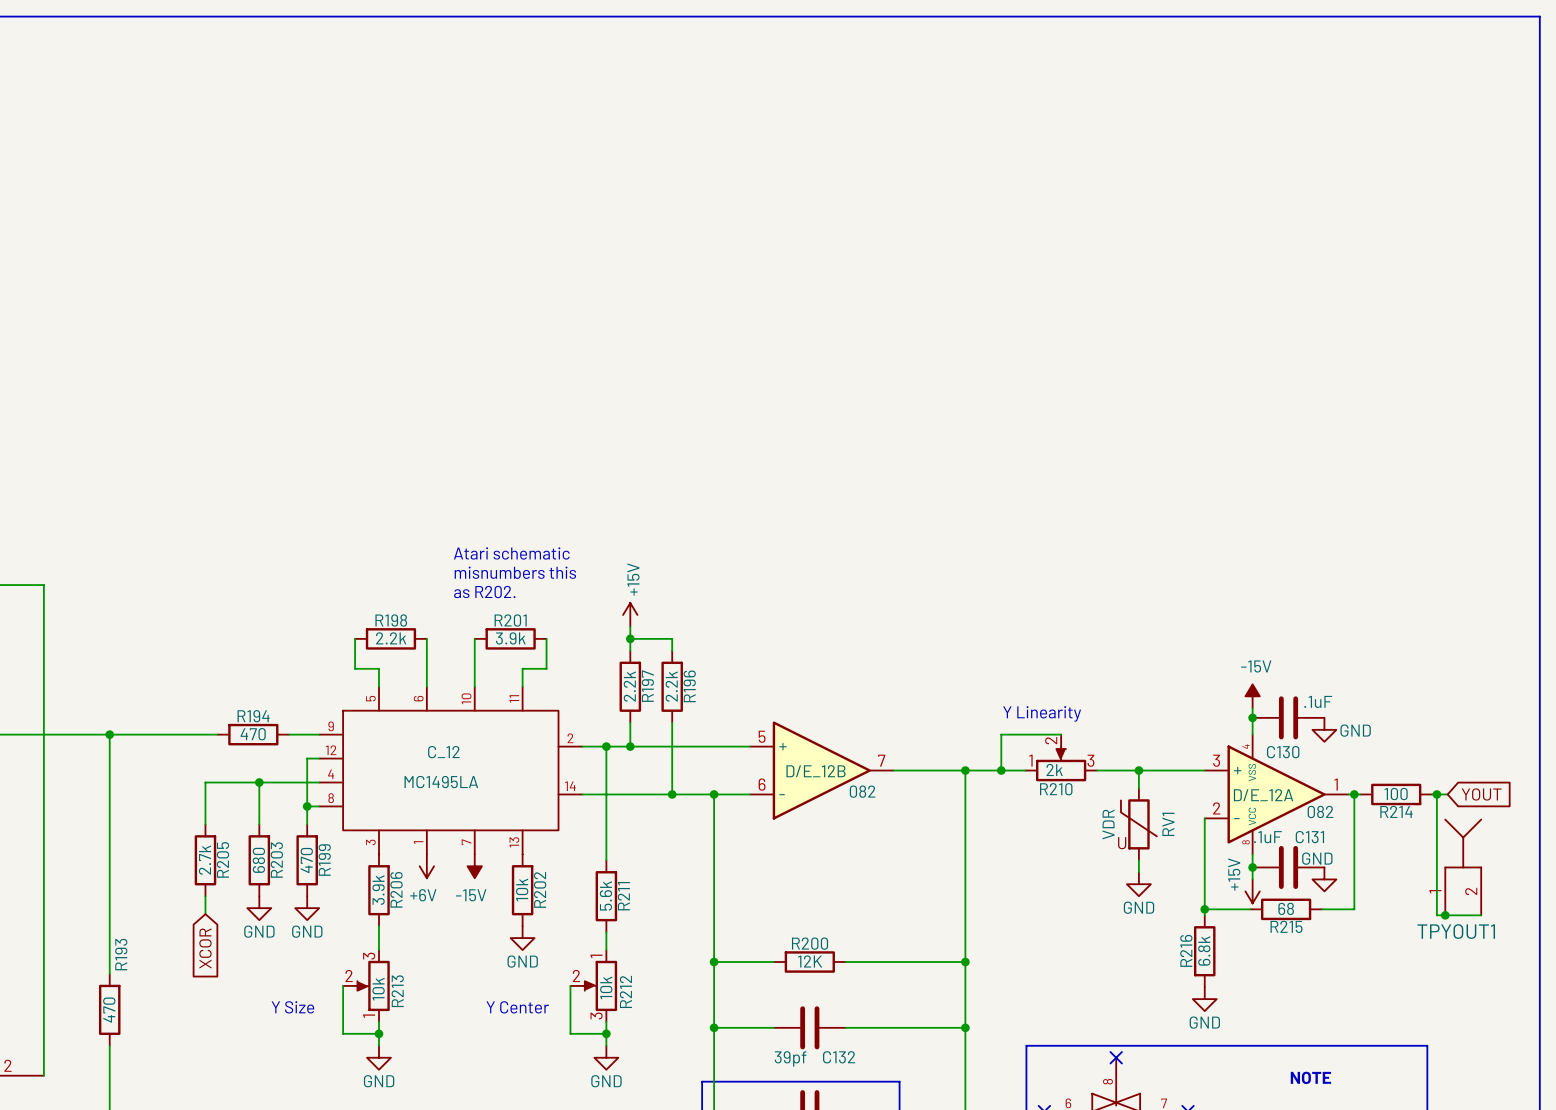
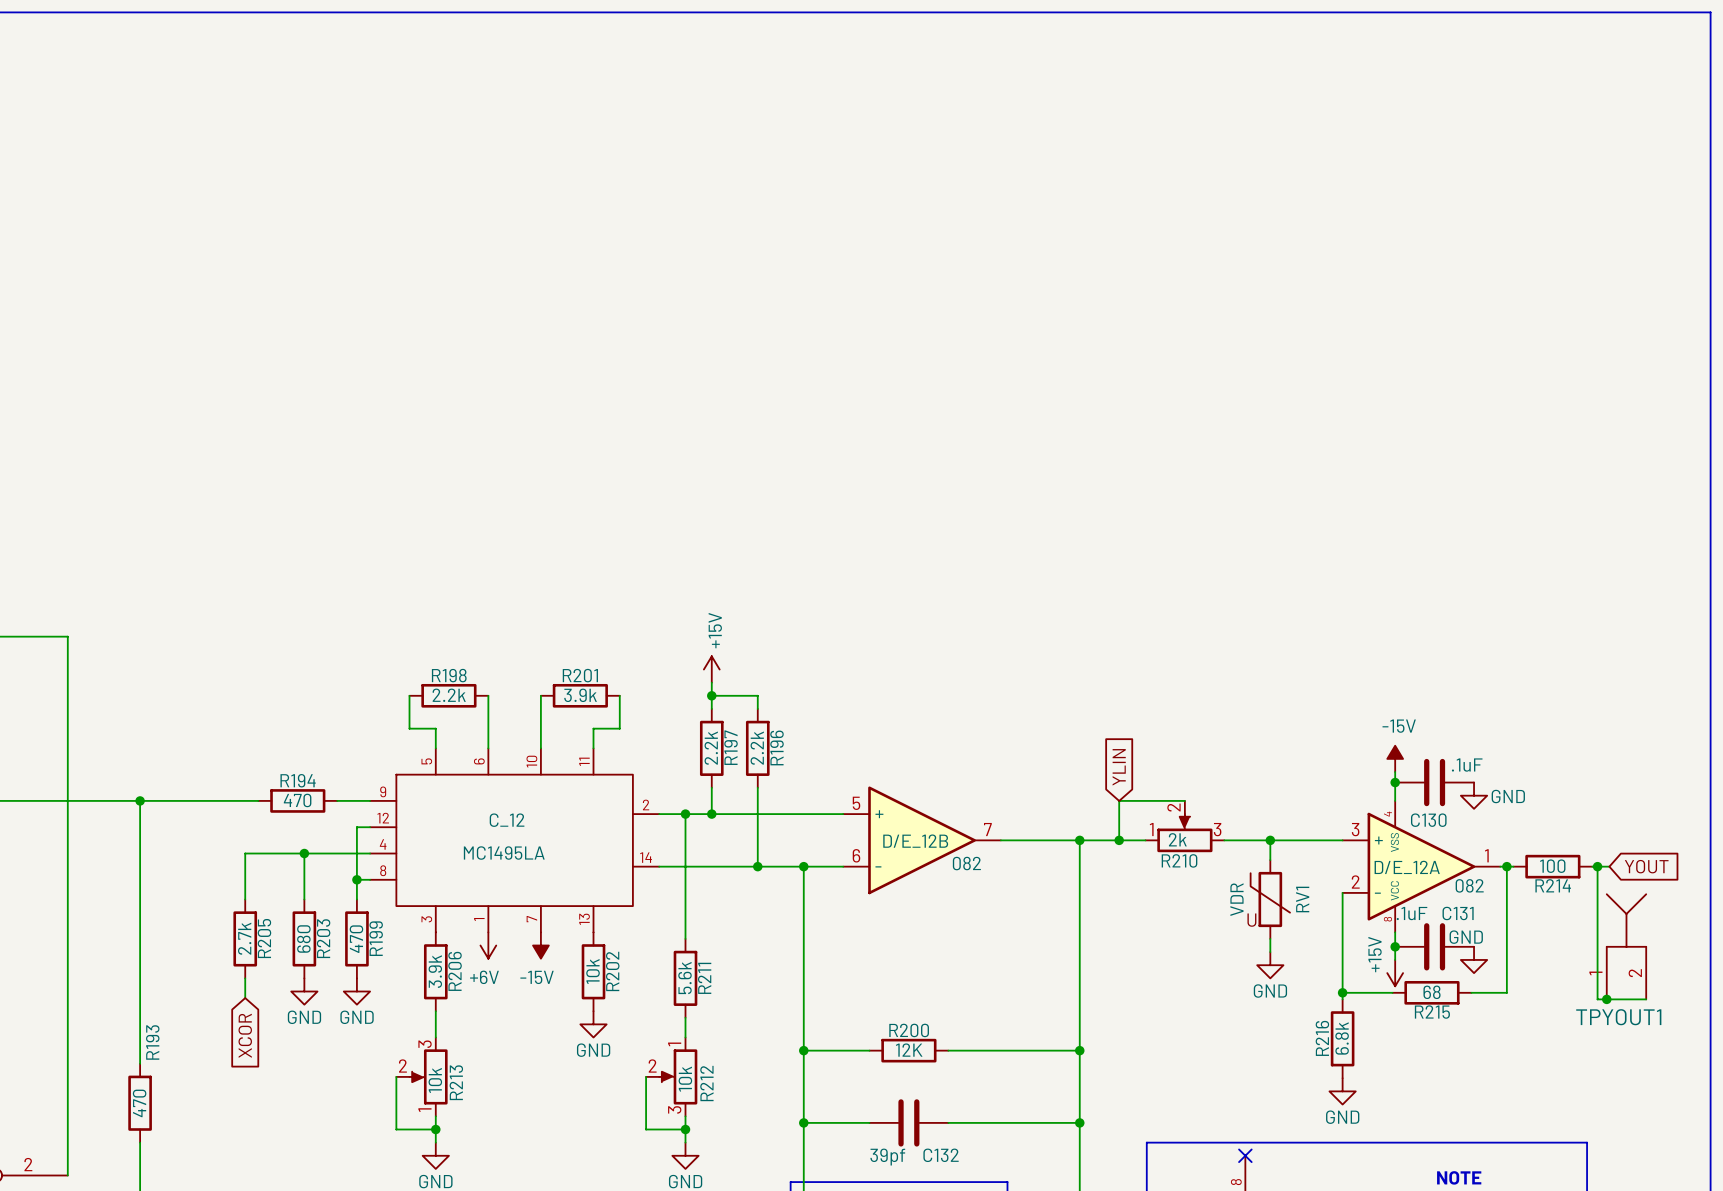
text: Atari schematic (511, 553) -> none
text: misnumbers this (515, 572) -> none
text: as R202. (484, 592) -> none
global label: none -> YLIN (1119, 767)
text: Y Linearity (1042, 713) -> none
text: Y Size (292, 1007) -> none
text: Y Center (517, 1007) -> none

